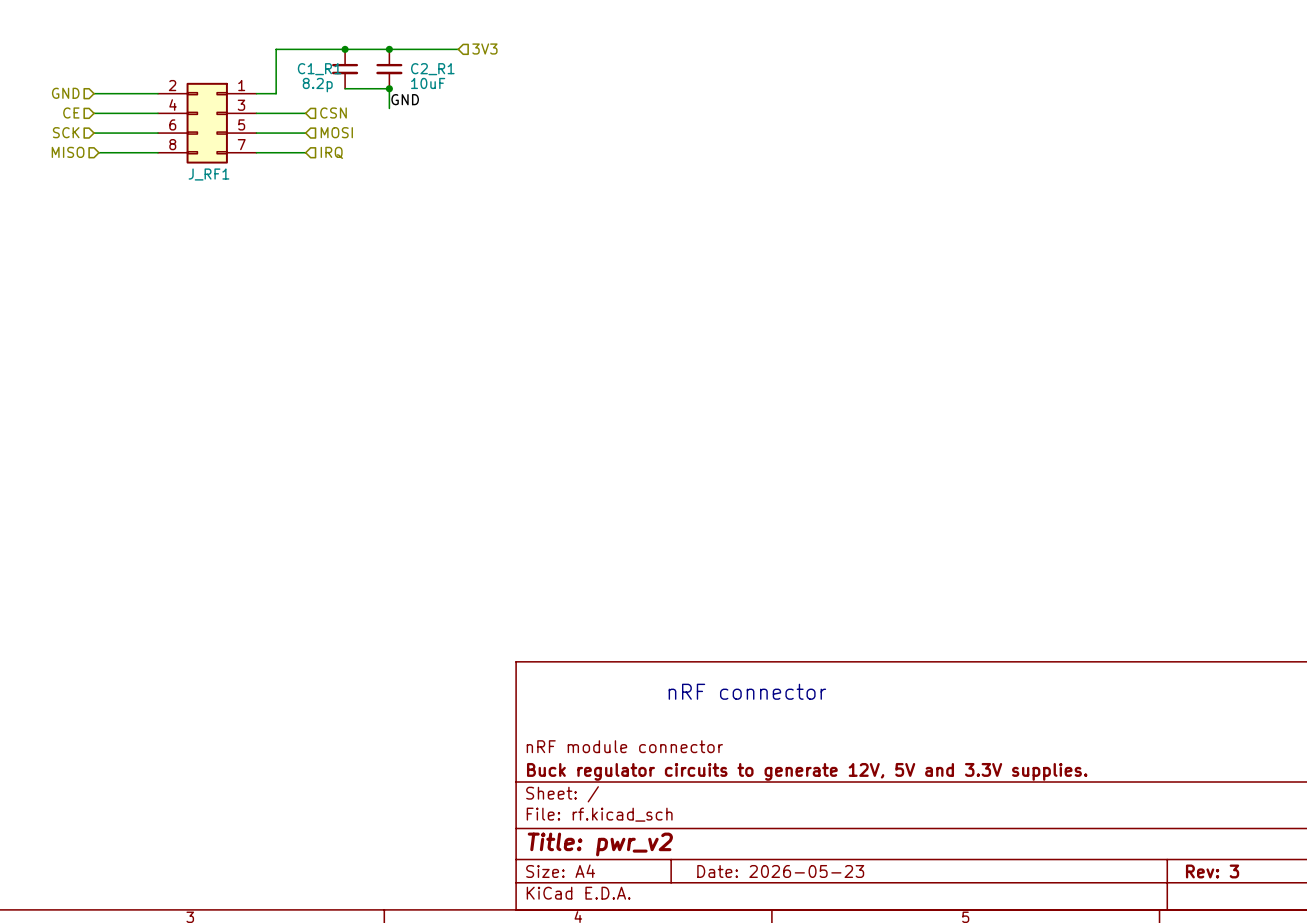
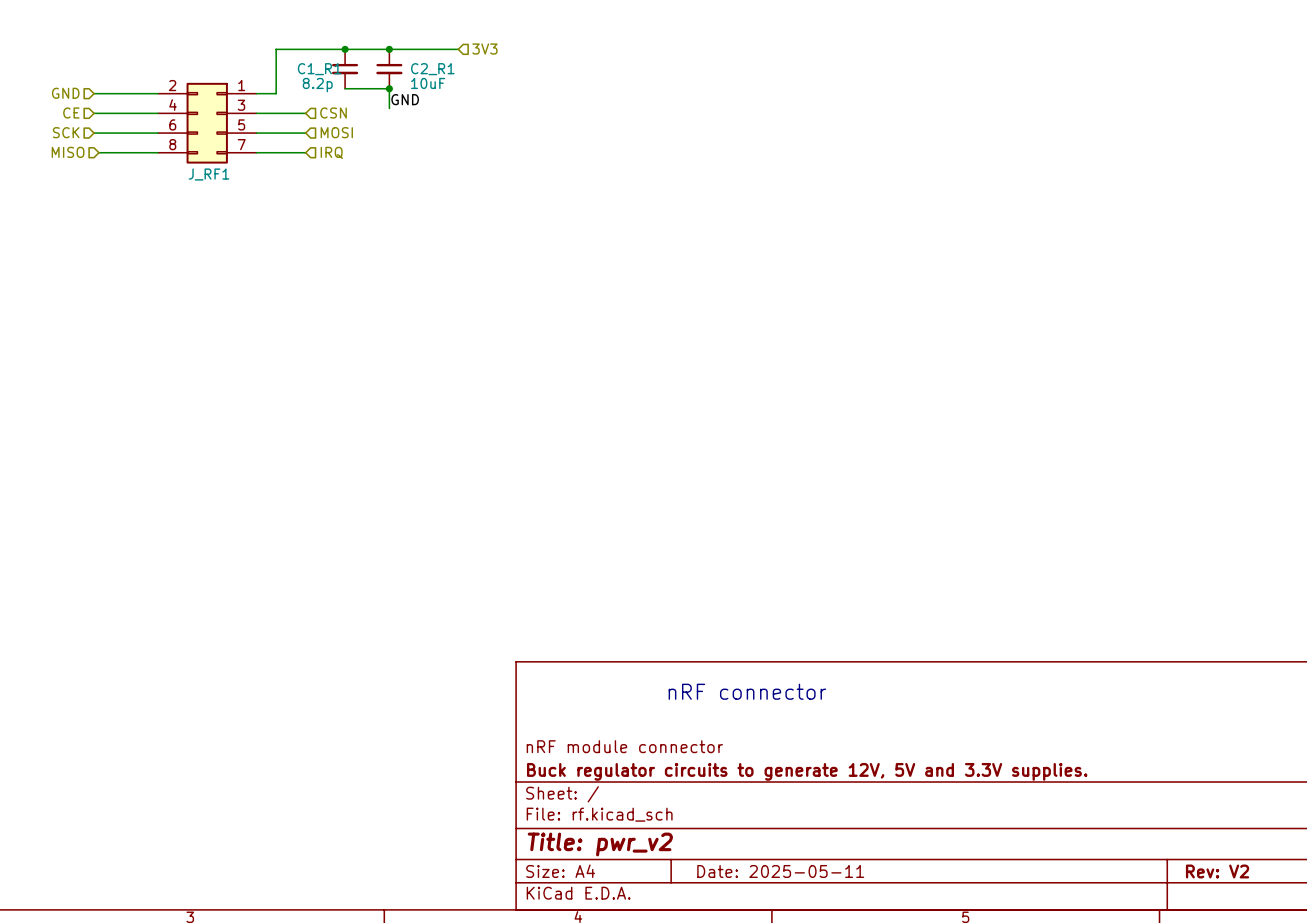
title block: Date: 2026-05-23 (780, 871) -> Date: 2025-05-11 (780, 871)
title block: Rev: 3 (1212, 871) -> Rev: V2 (1217, 871)

